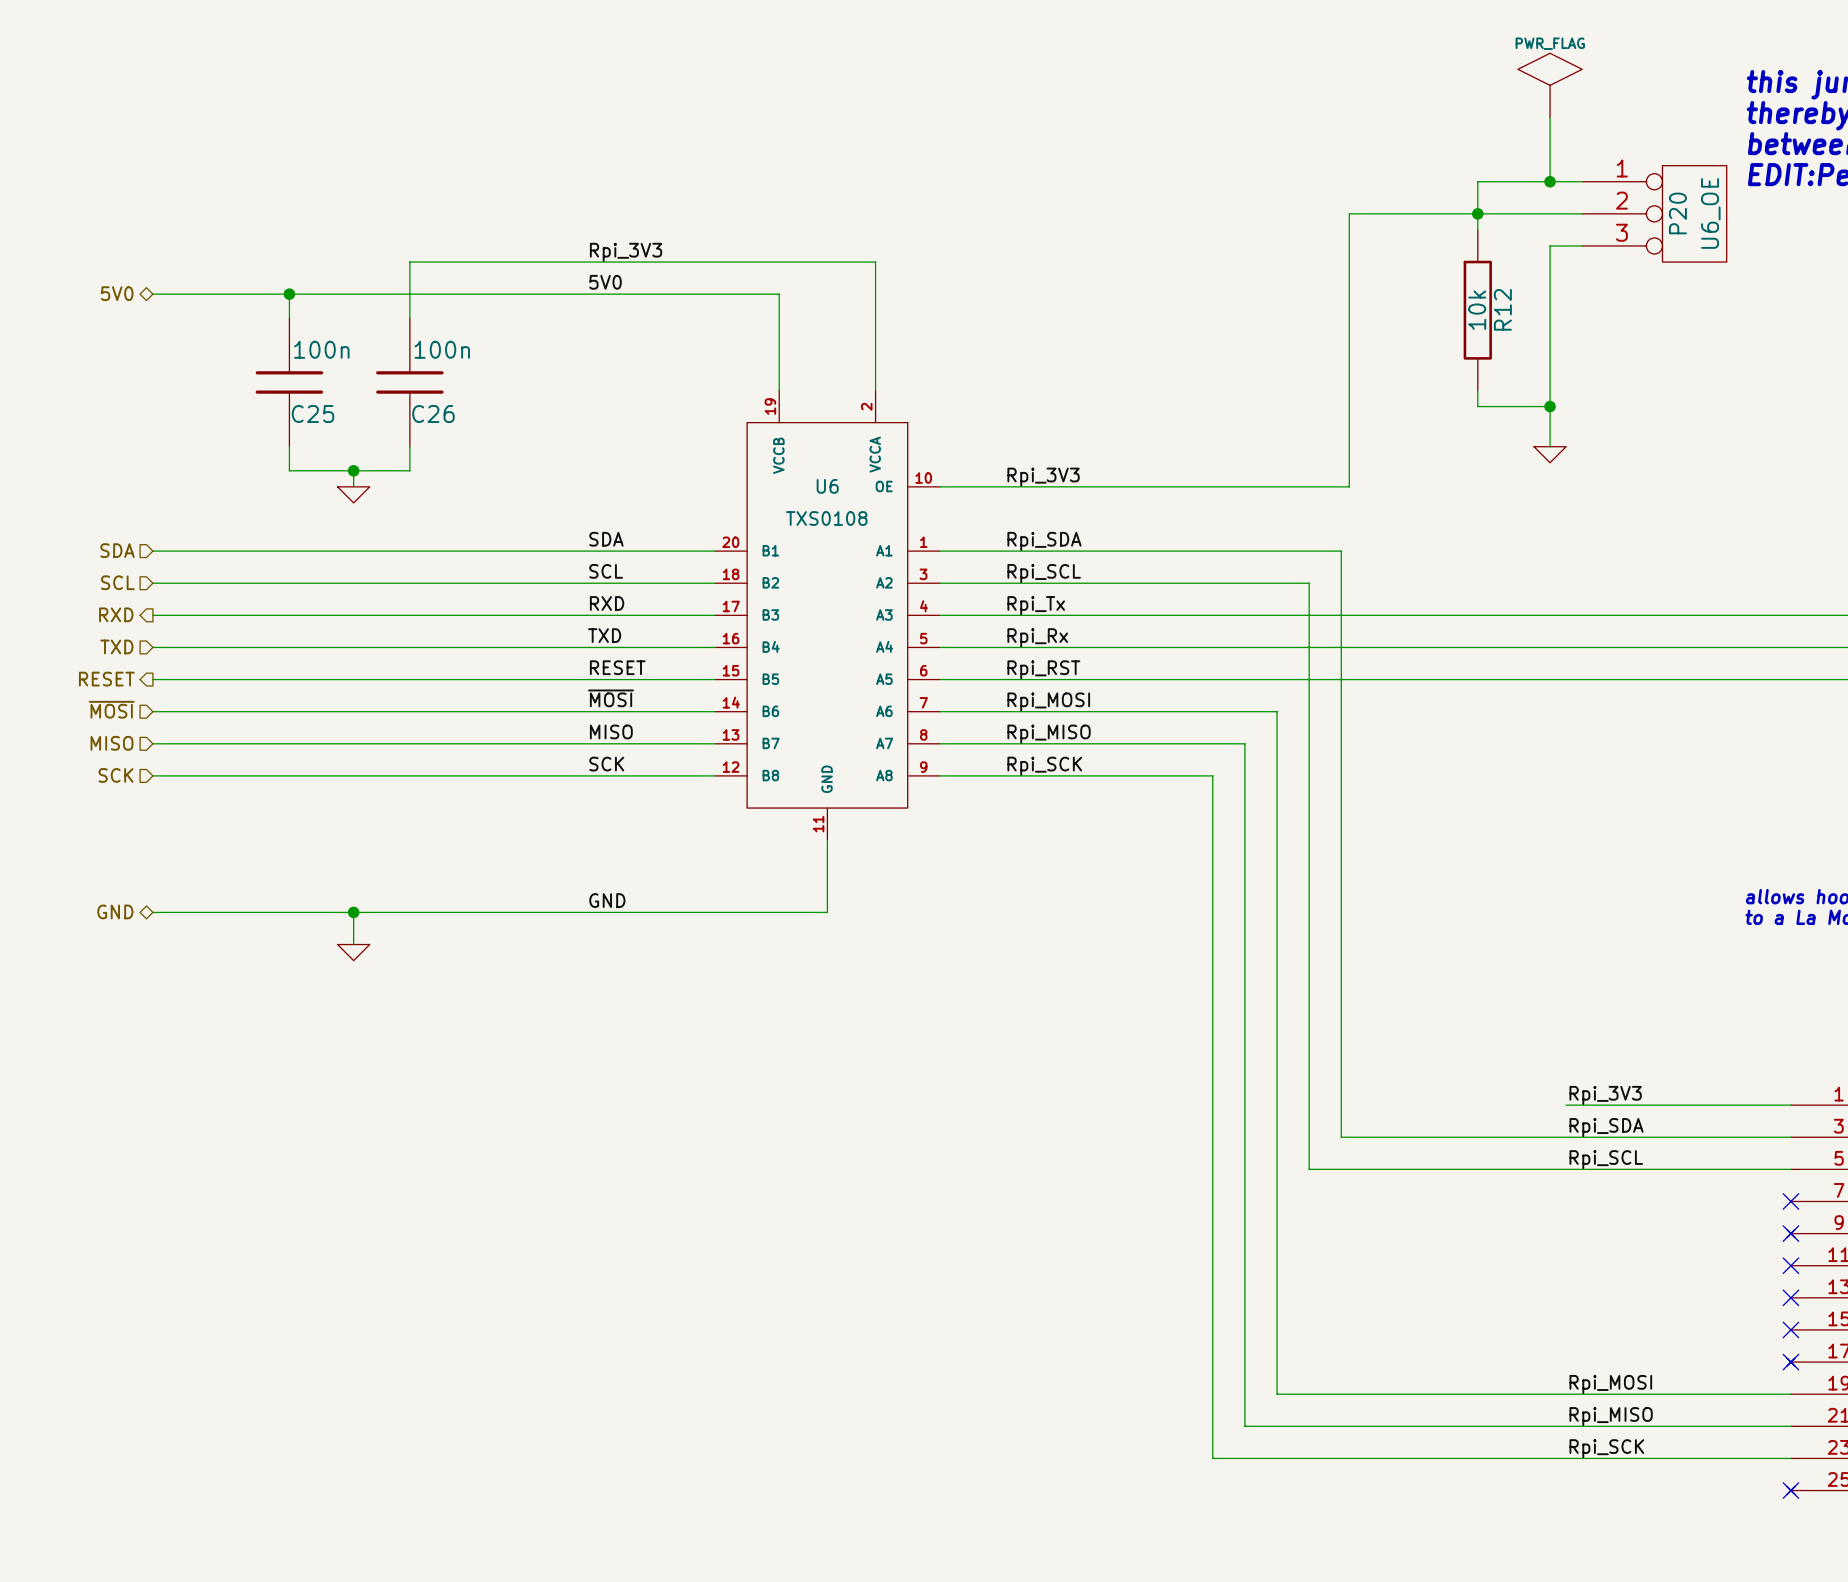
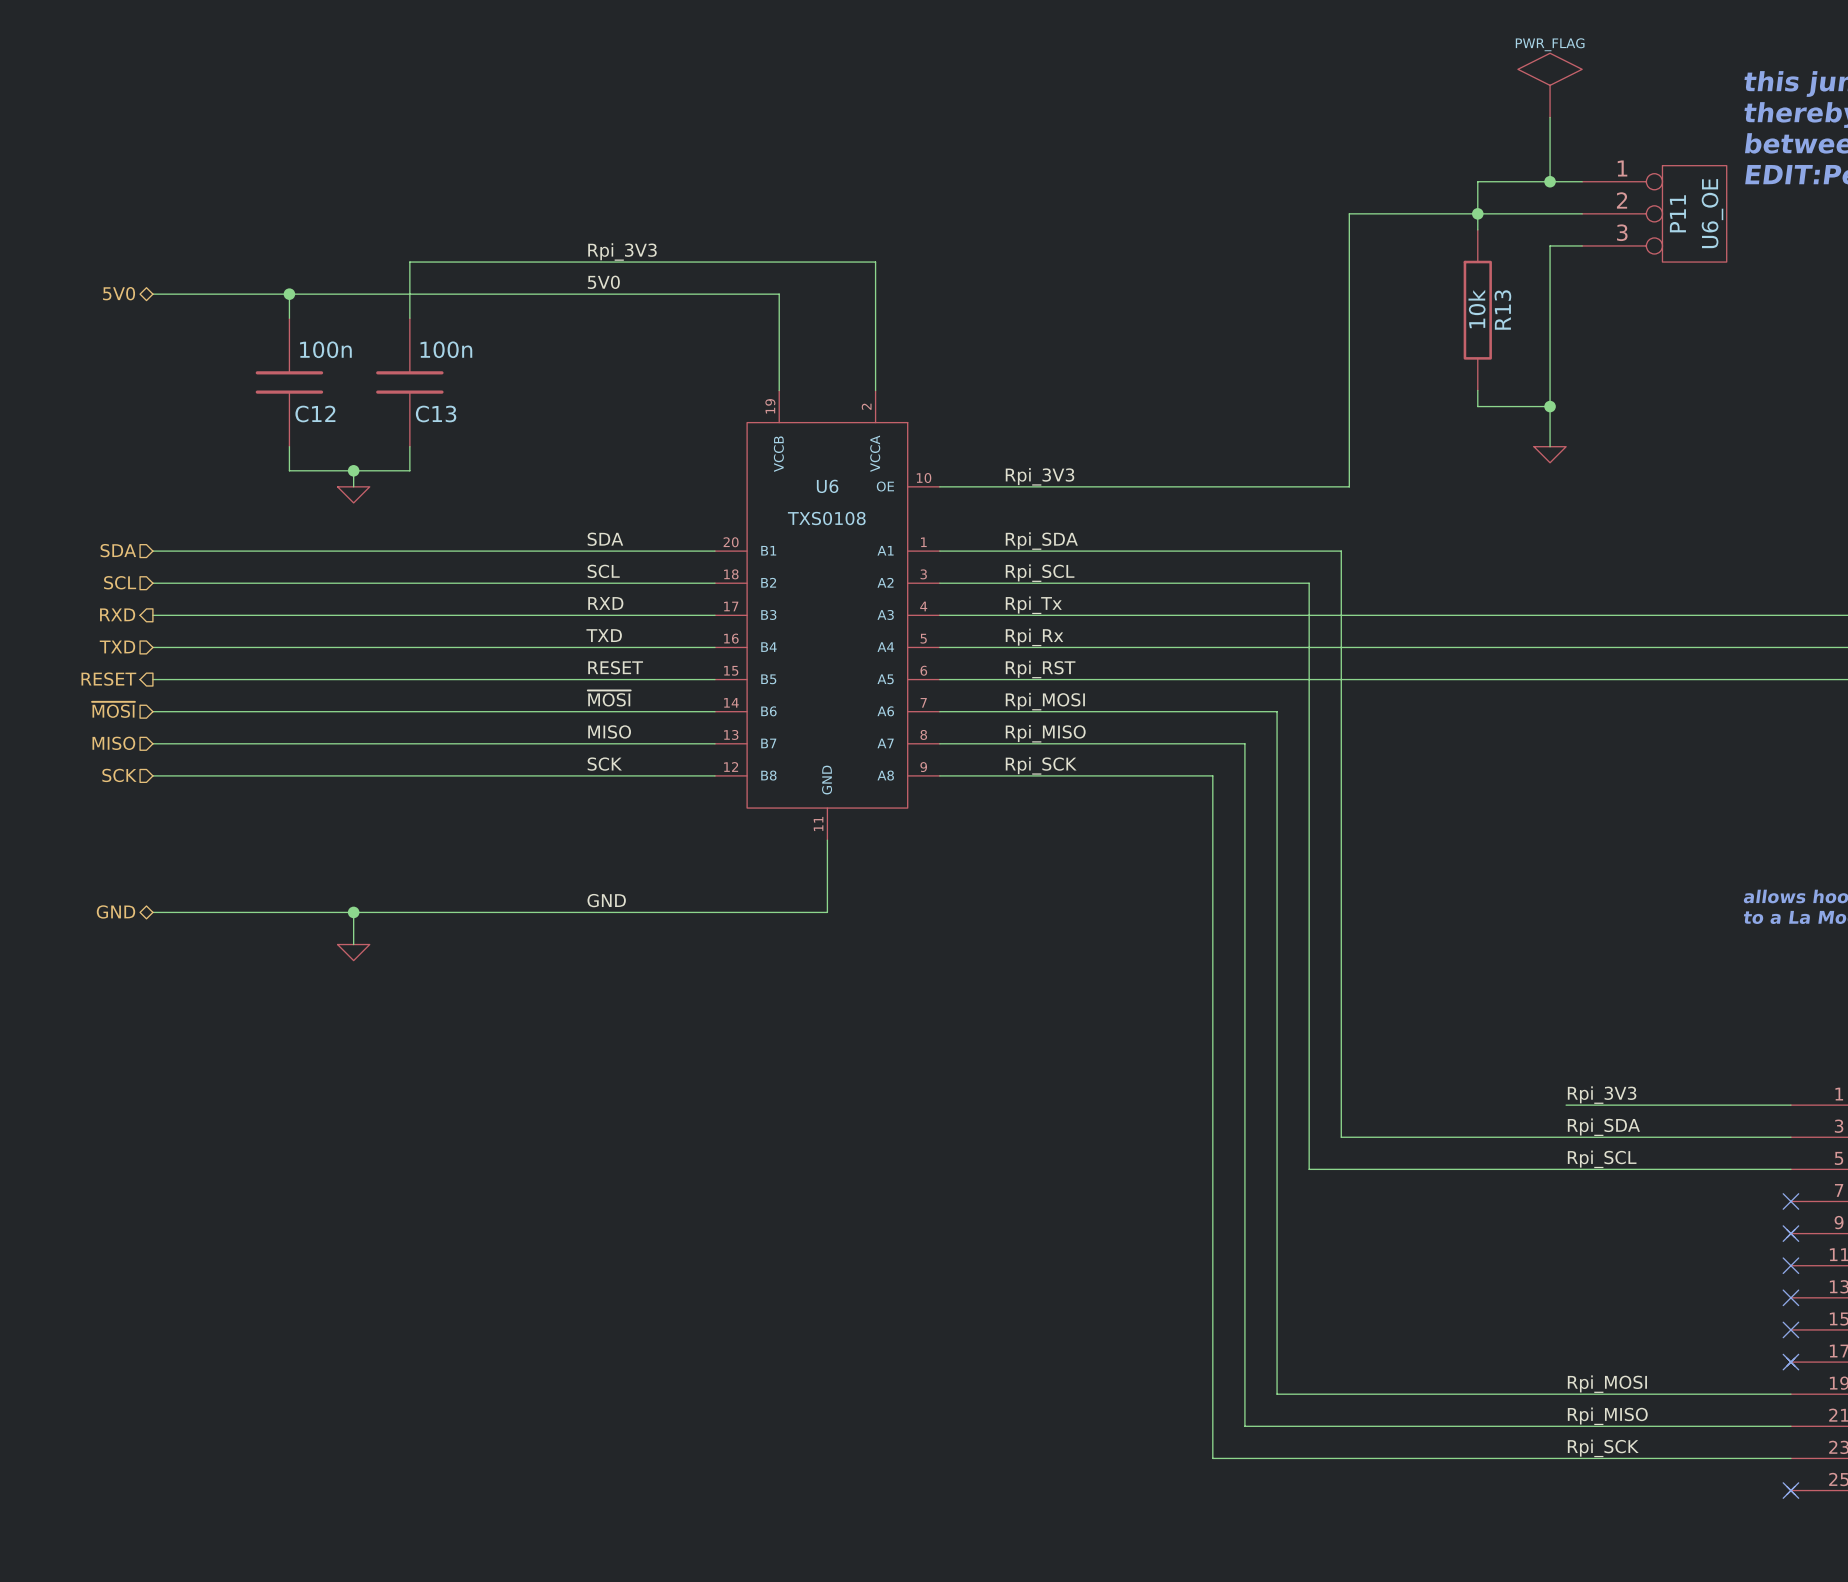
P20 name: P20 (1677, 213) -> P11 (1677, 213)
R12 name: R12 (1502, 309) -> R13 (1502, 310)
C25 name: C25 (313, 413) -> C12 (315, 414)
C26 name: C26 (433, 413) -> C13 (436, 414)

